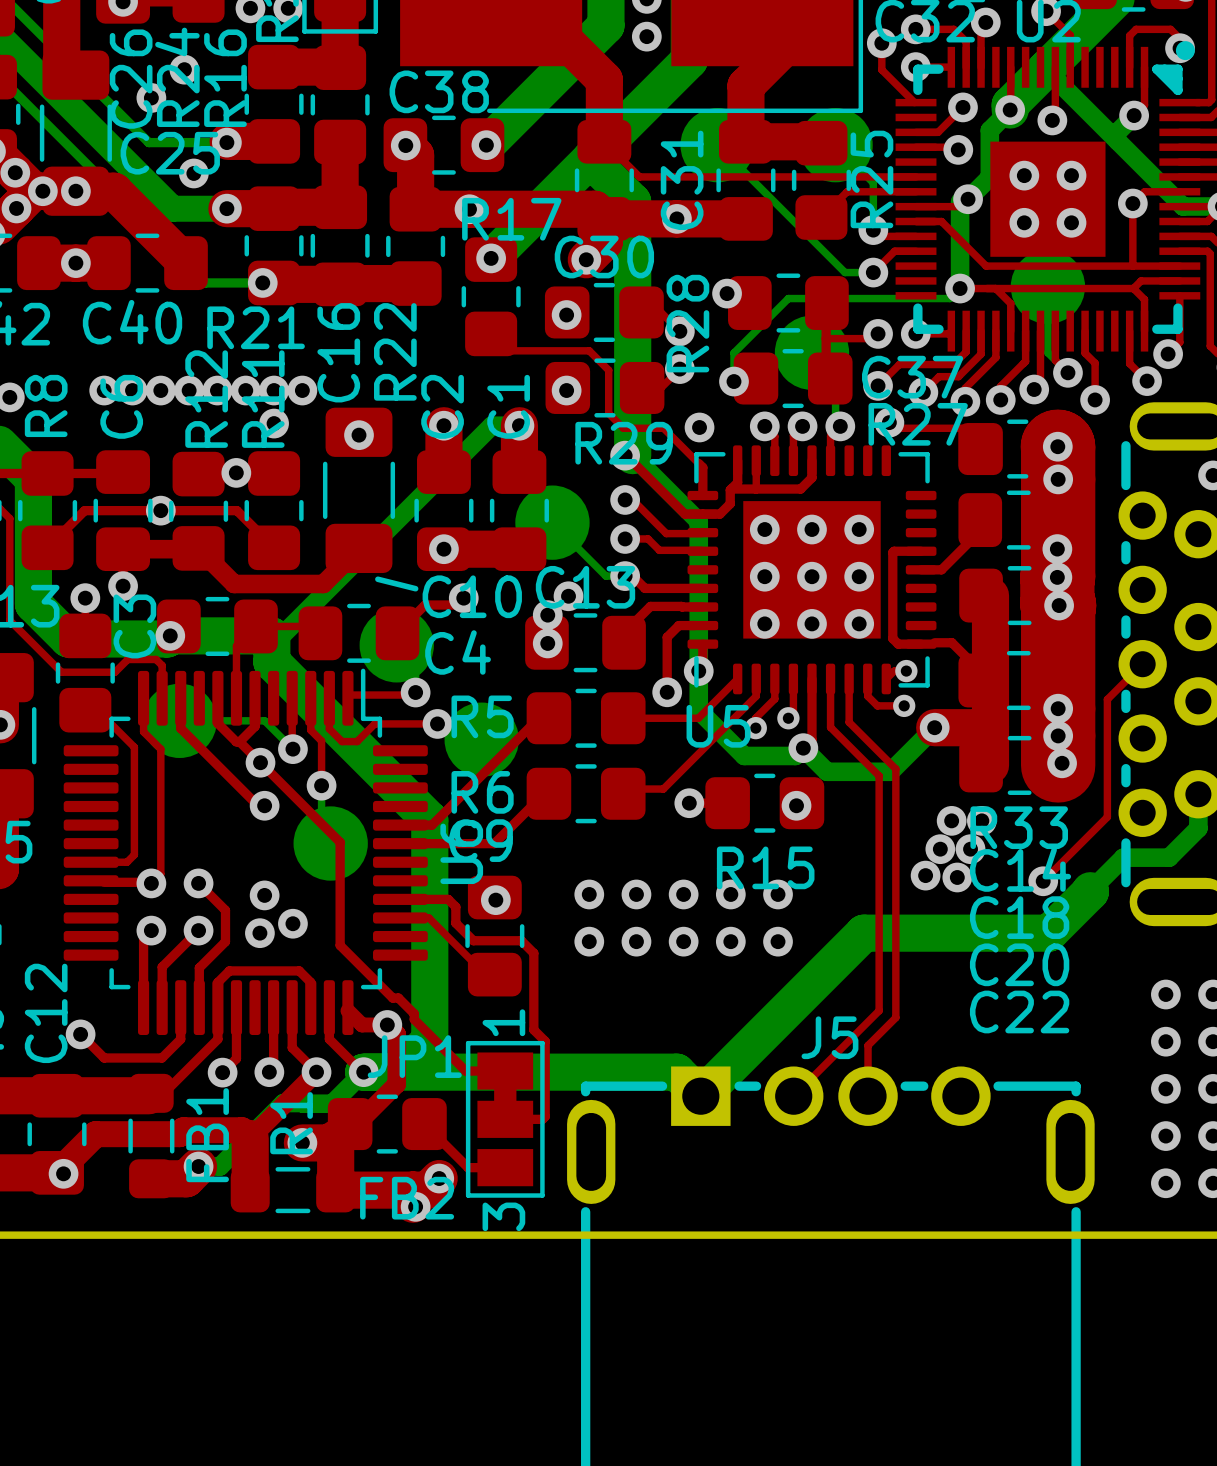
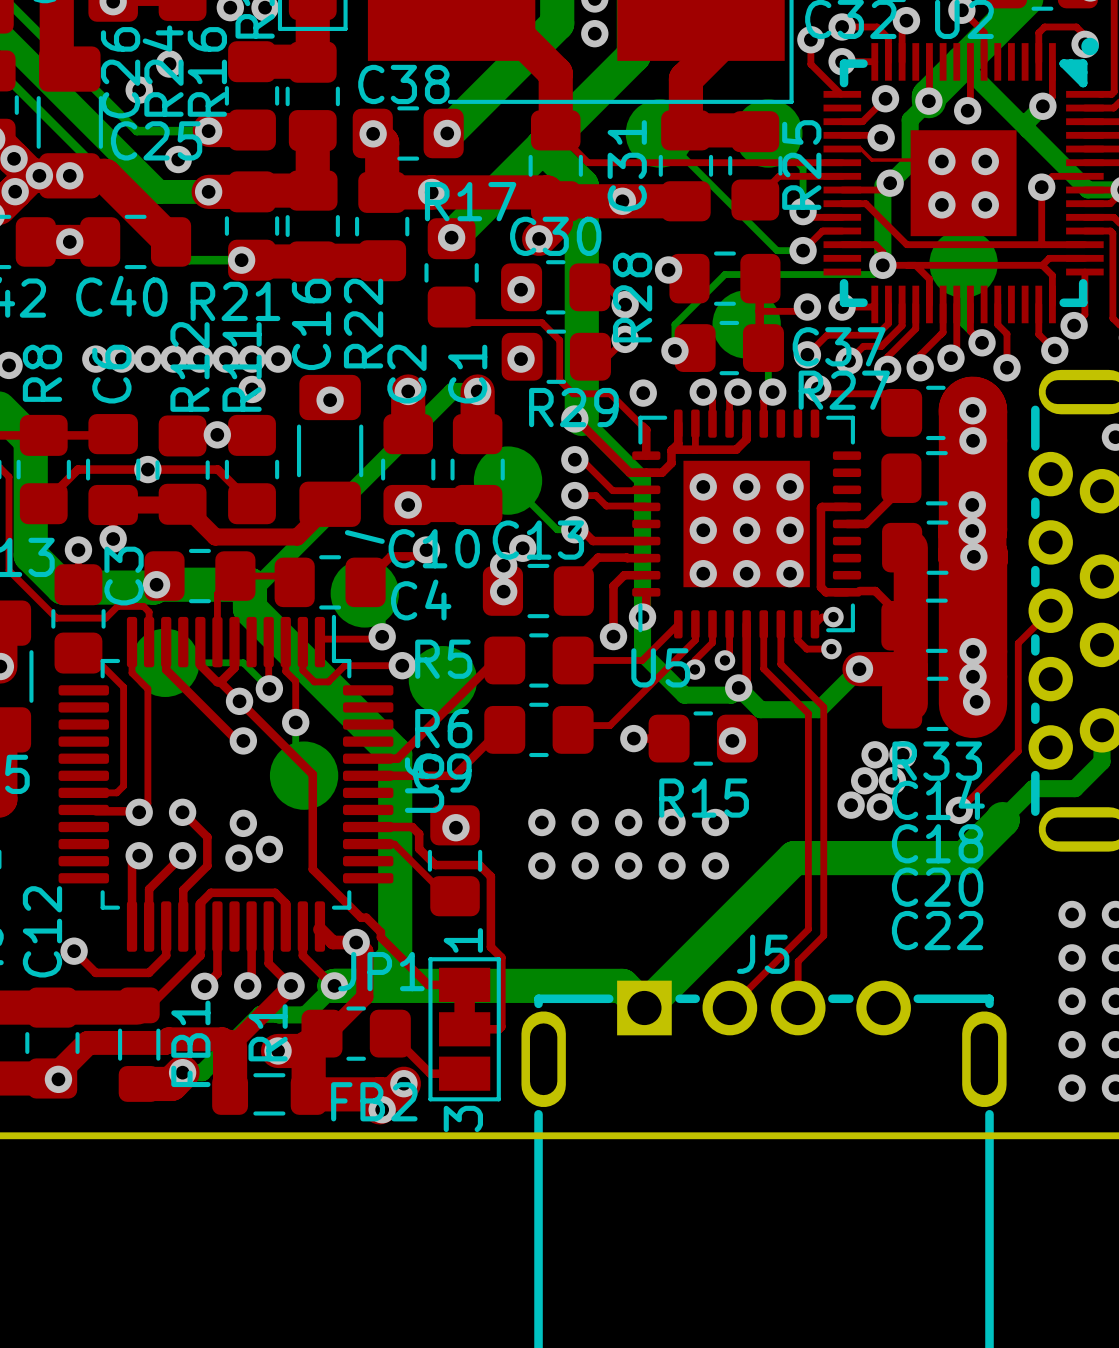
top track: none -> (842, 149) (860, 149) (871, 160) (941, 161)
top track: none -> (842, 244) (875, 244) (882, 252) (882, 265)

